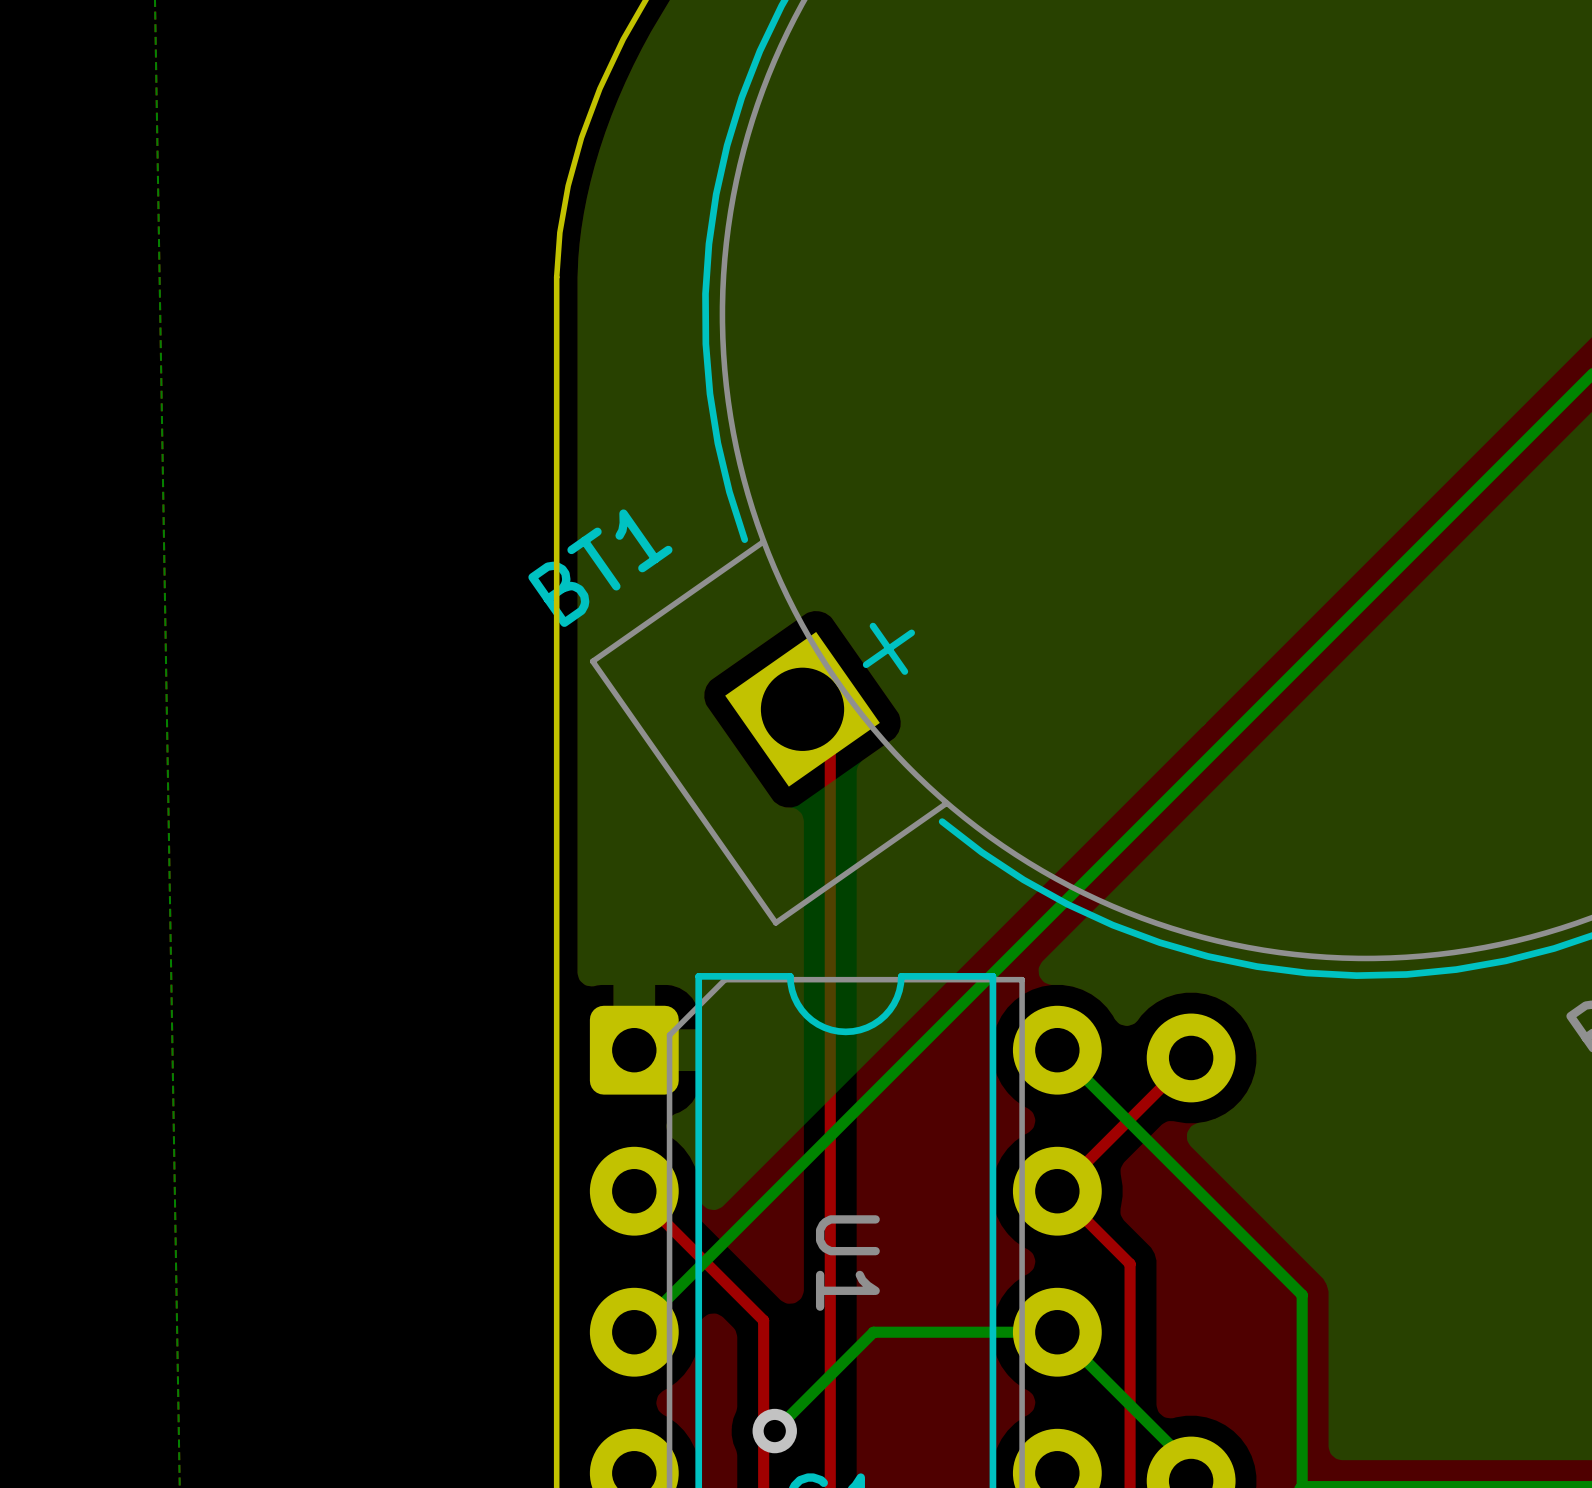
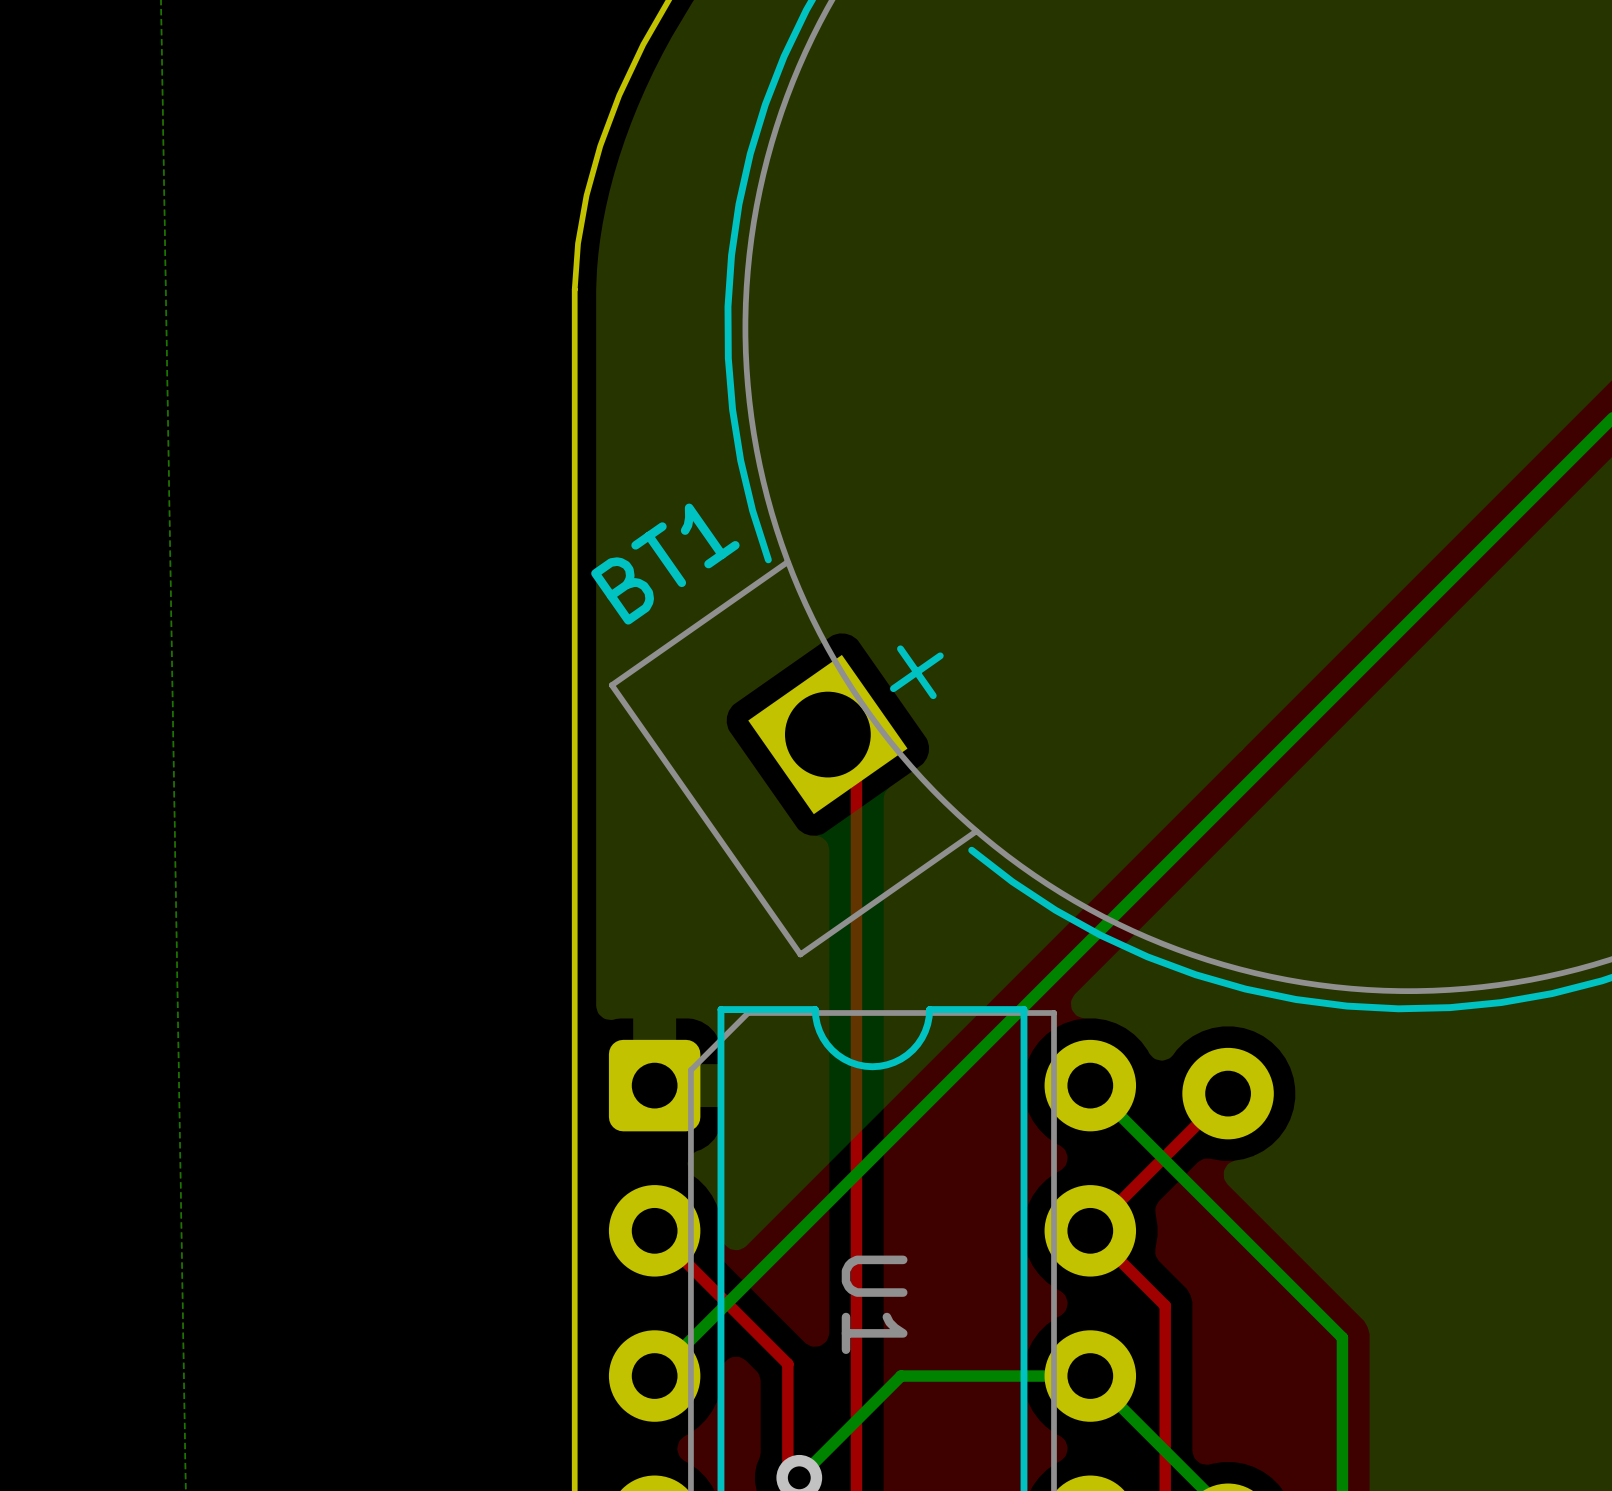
BT1 name position: BT1 (600, 568) -> BT1 (665, 564)

